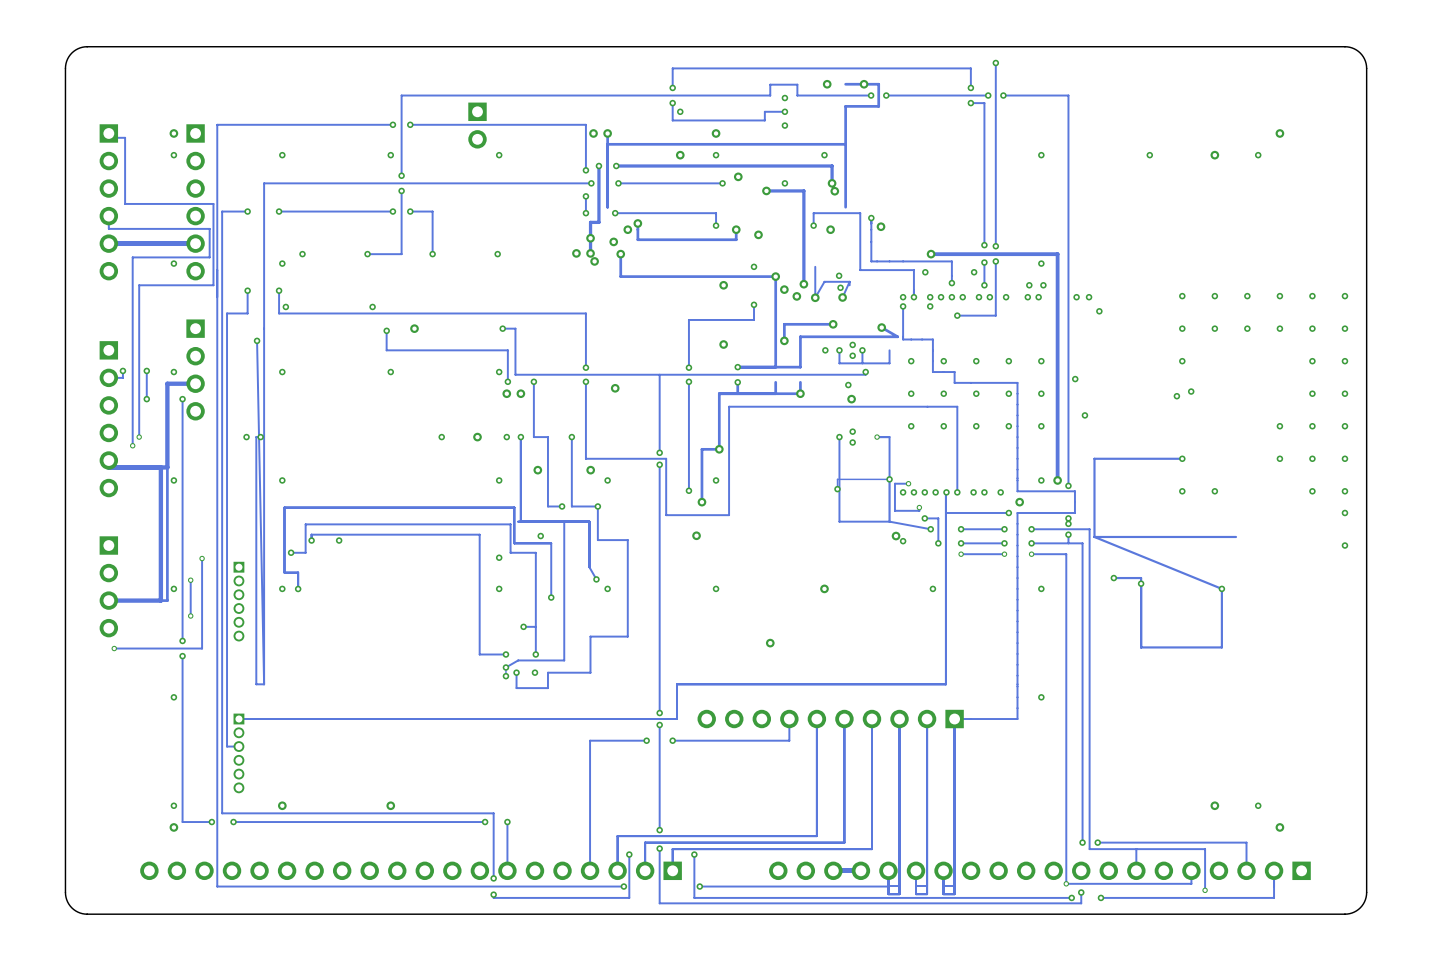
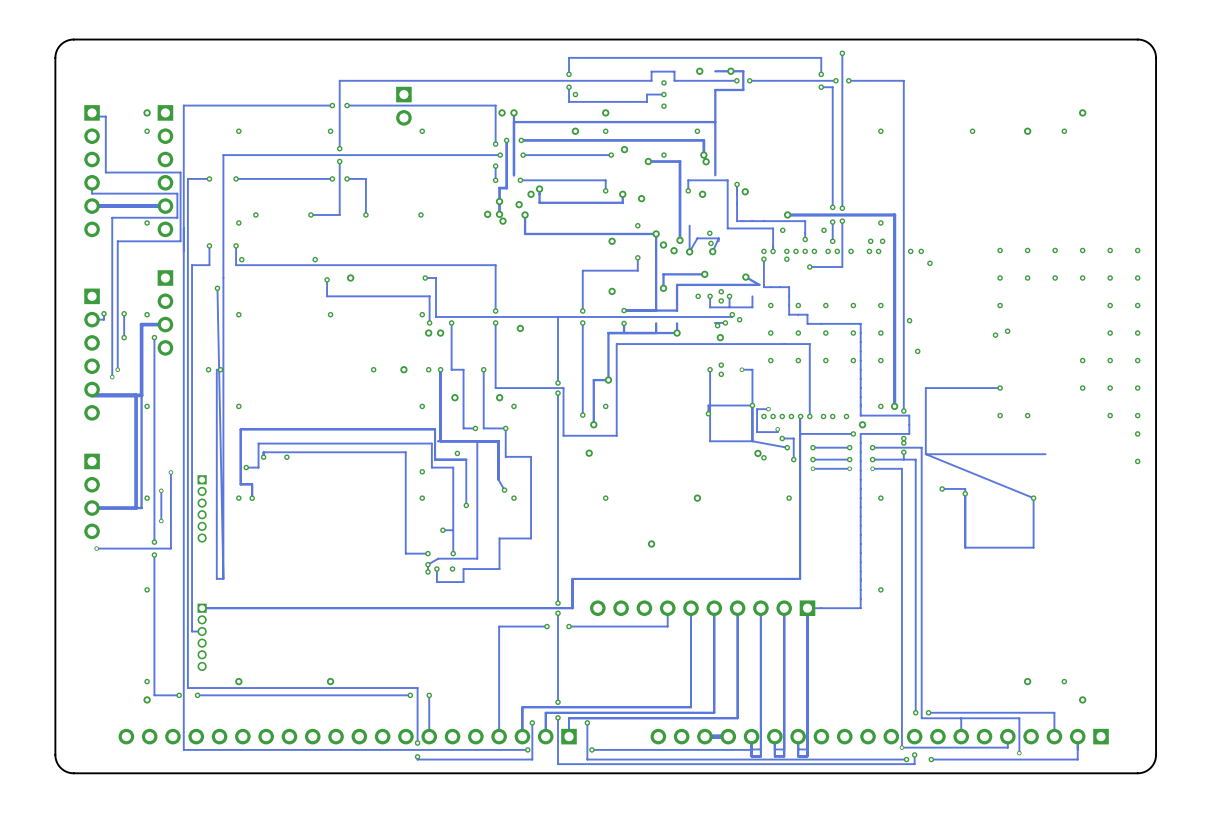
via: none -> (739, 319)
track: none -> (725, 322) (714, 322)
via: none -> (725, 322)

